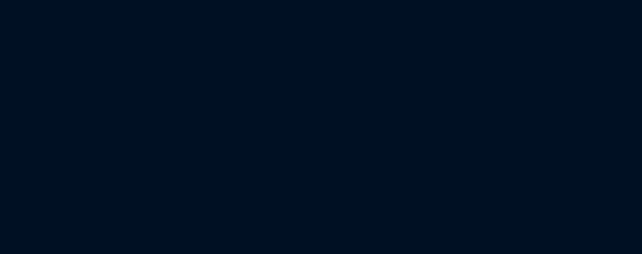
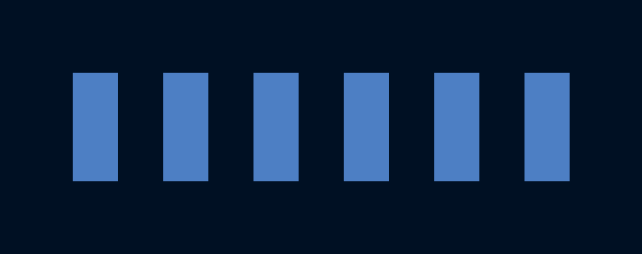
part: none -> (321, 127)

